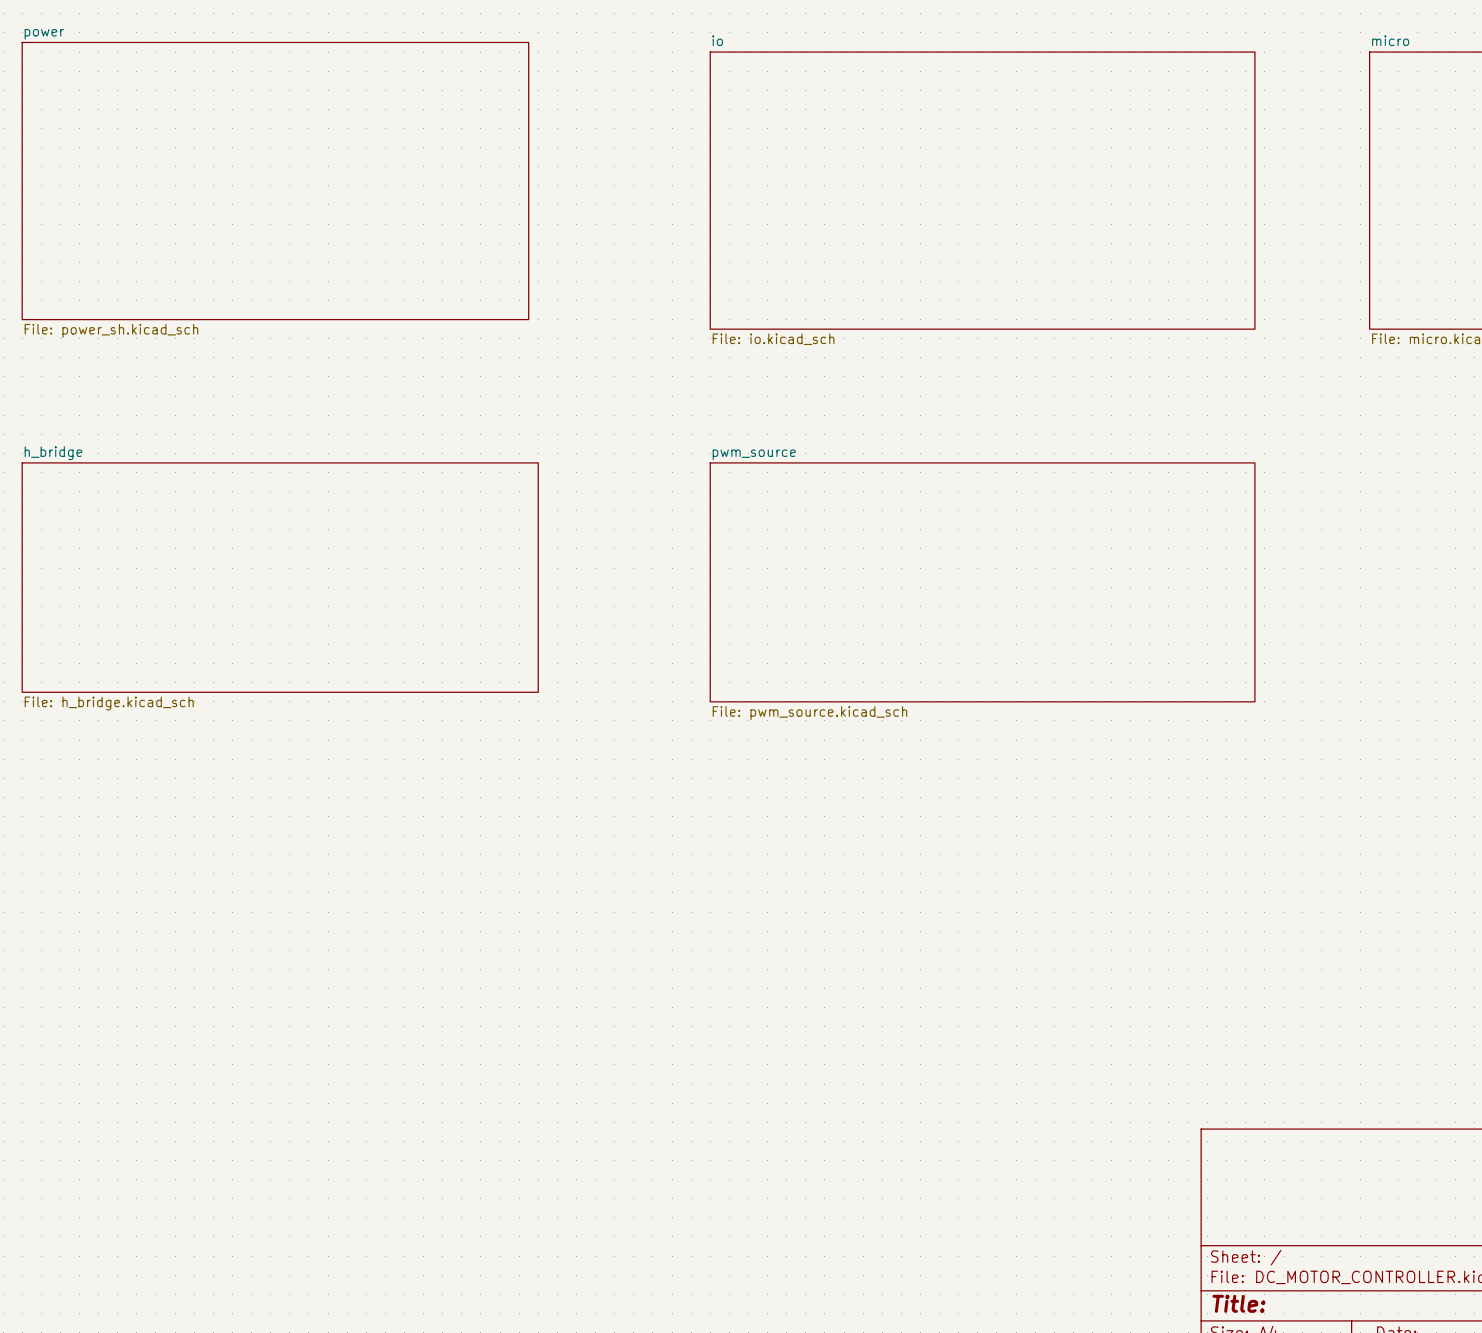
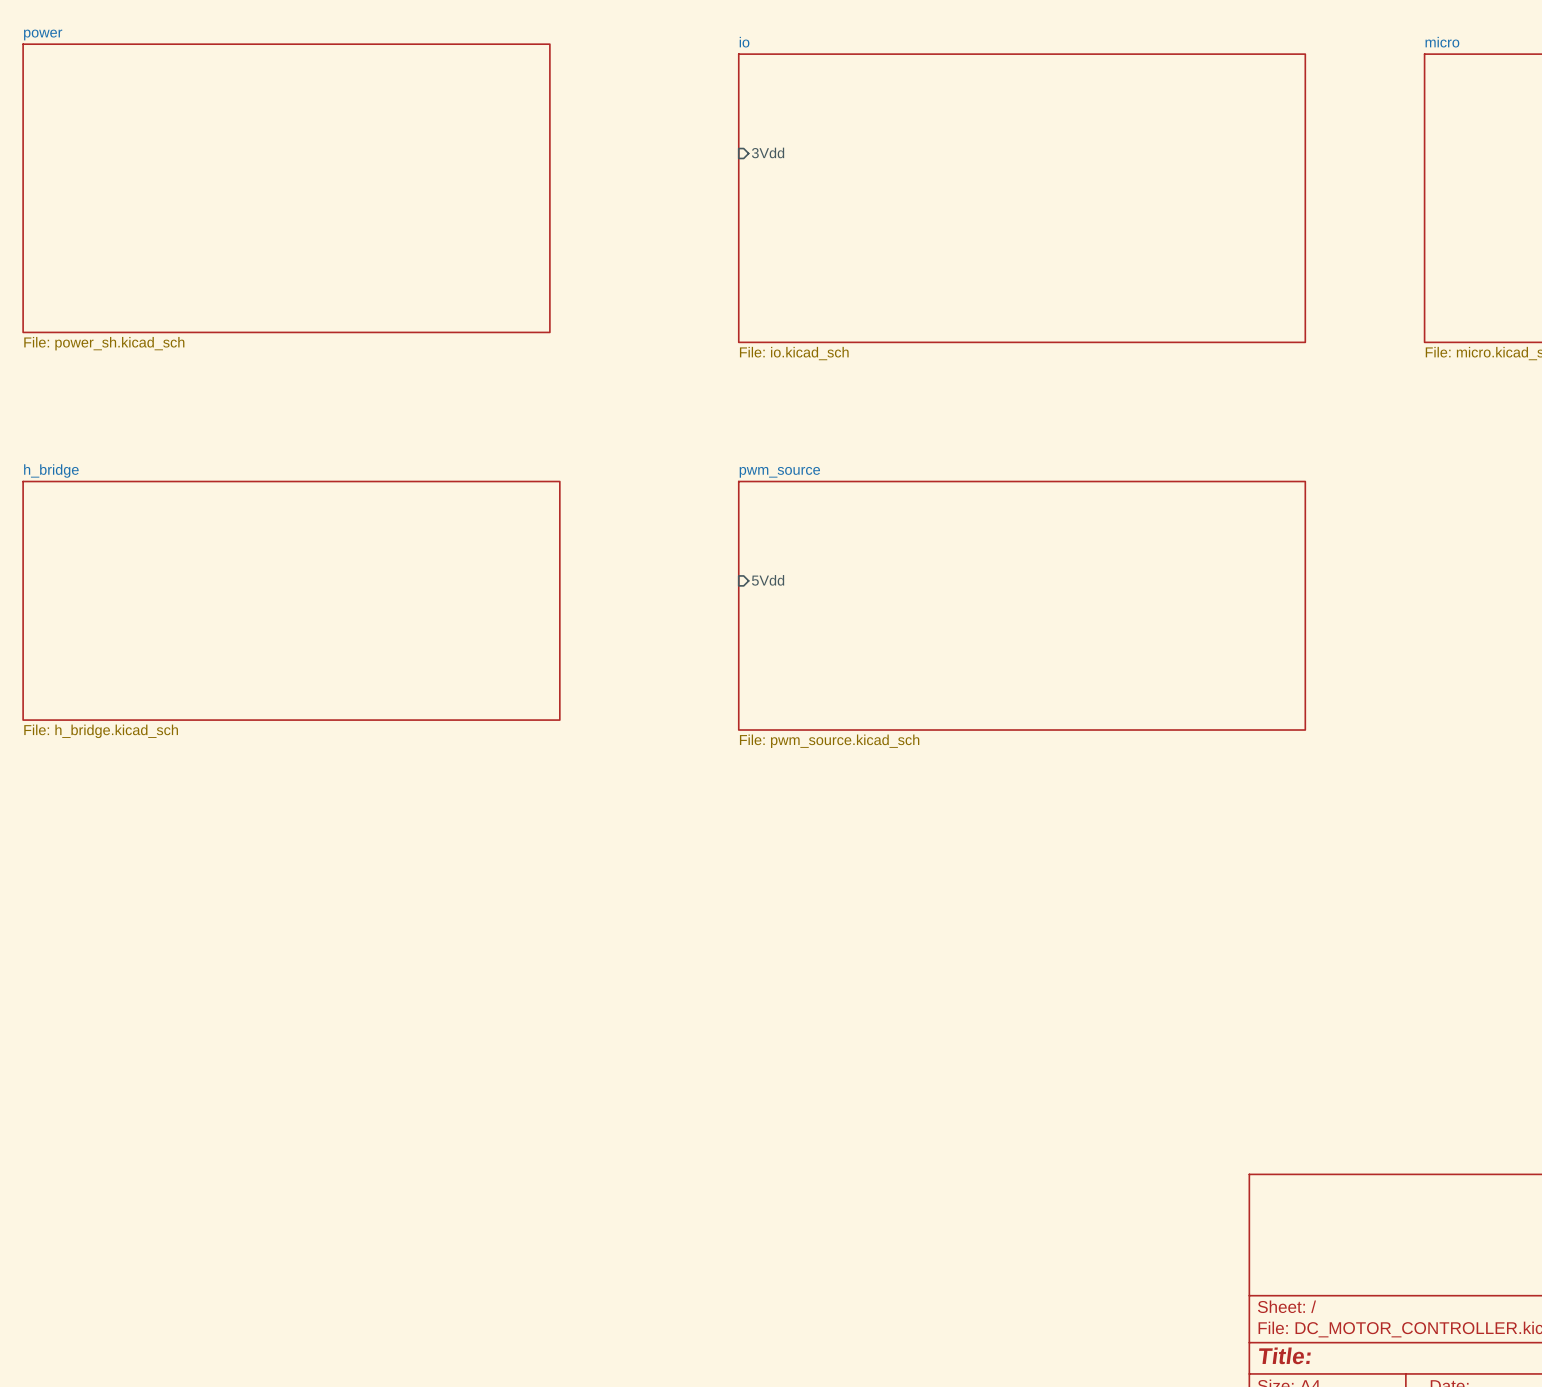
sheet pin: none -> 3Vdd (768, 152)
sheet pin: none -> 5Vdd (768, 580)

